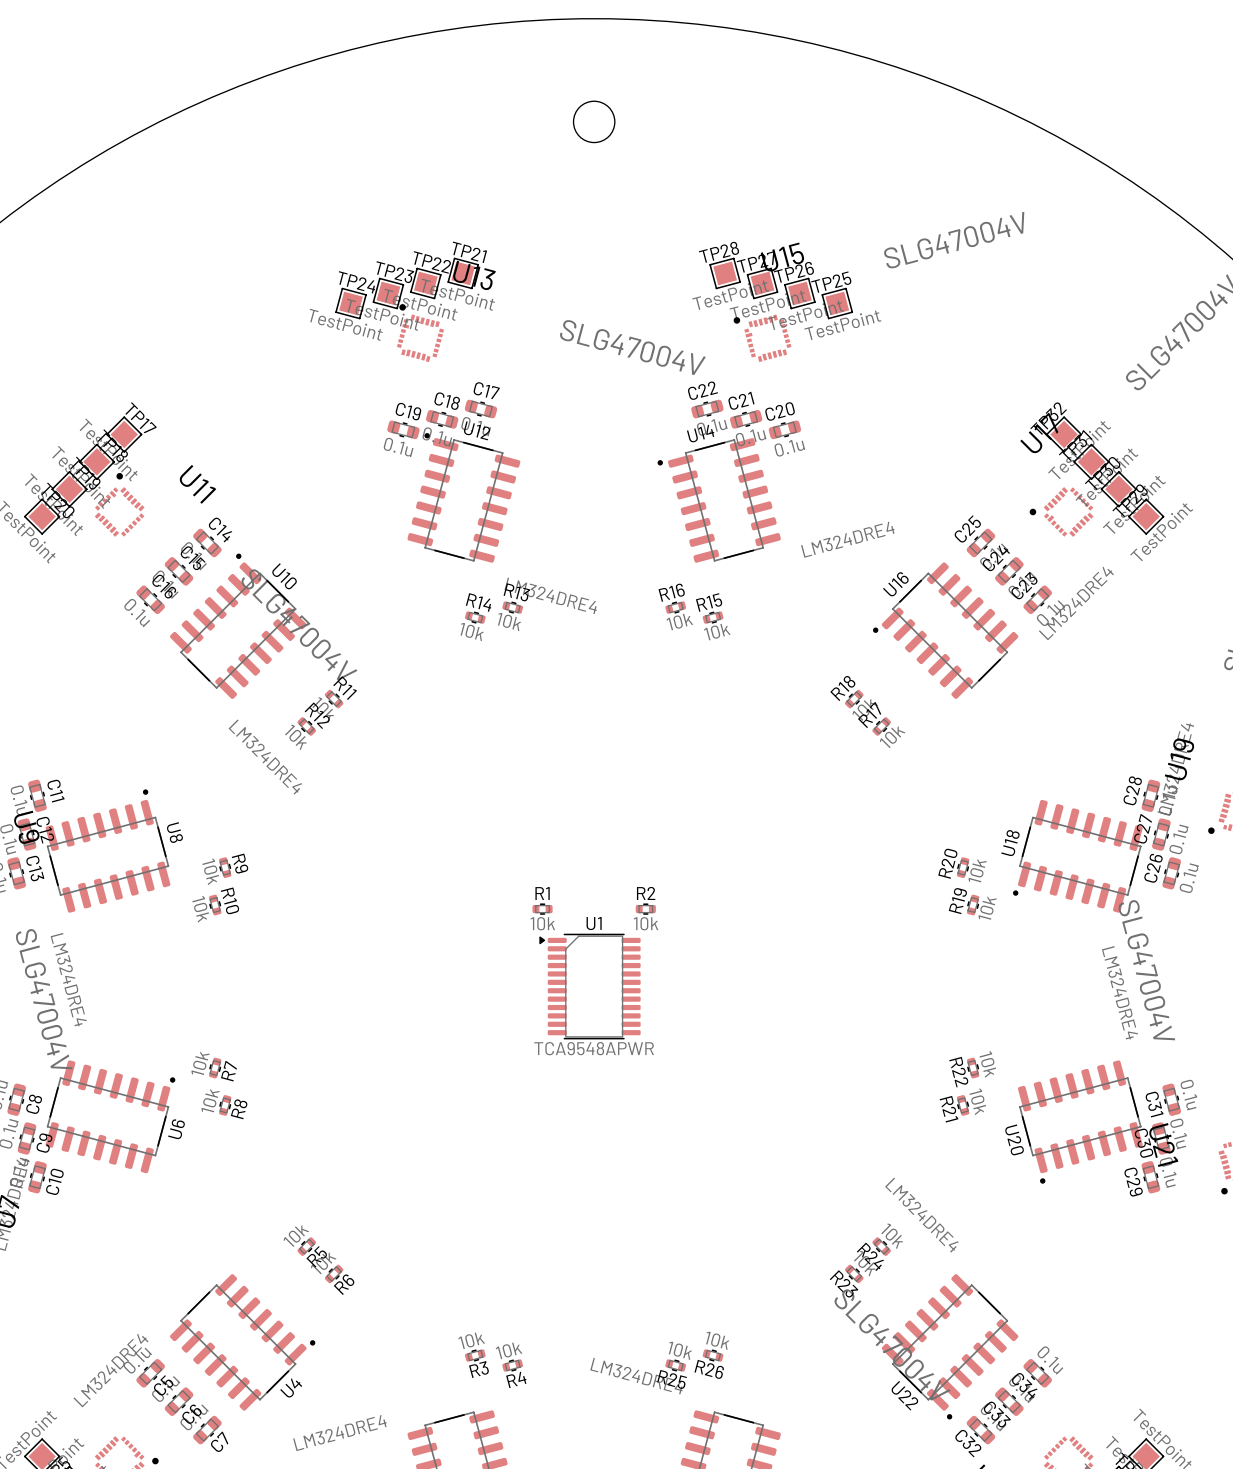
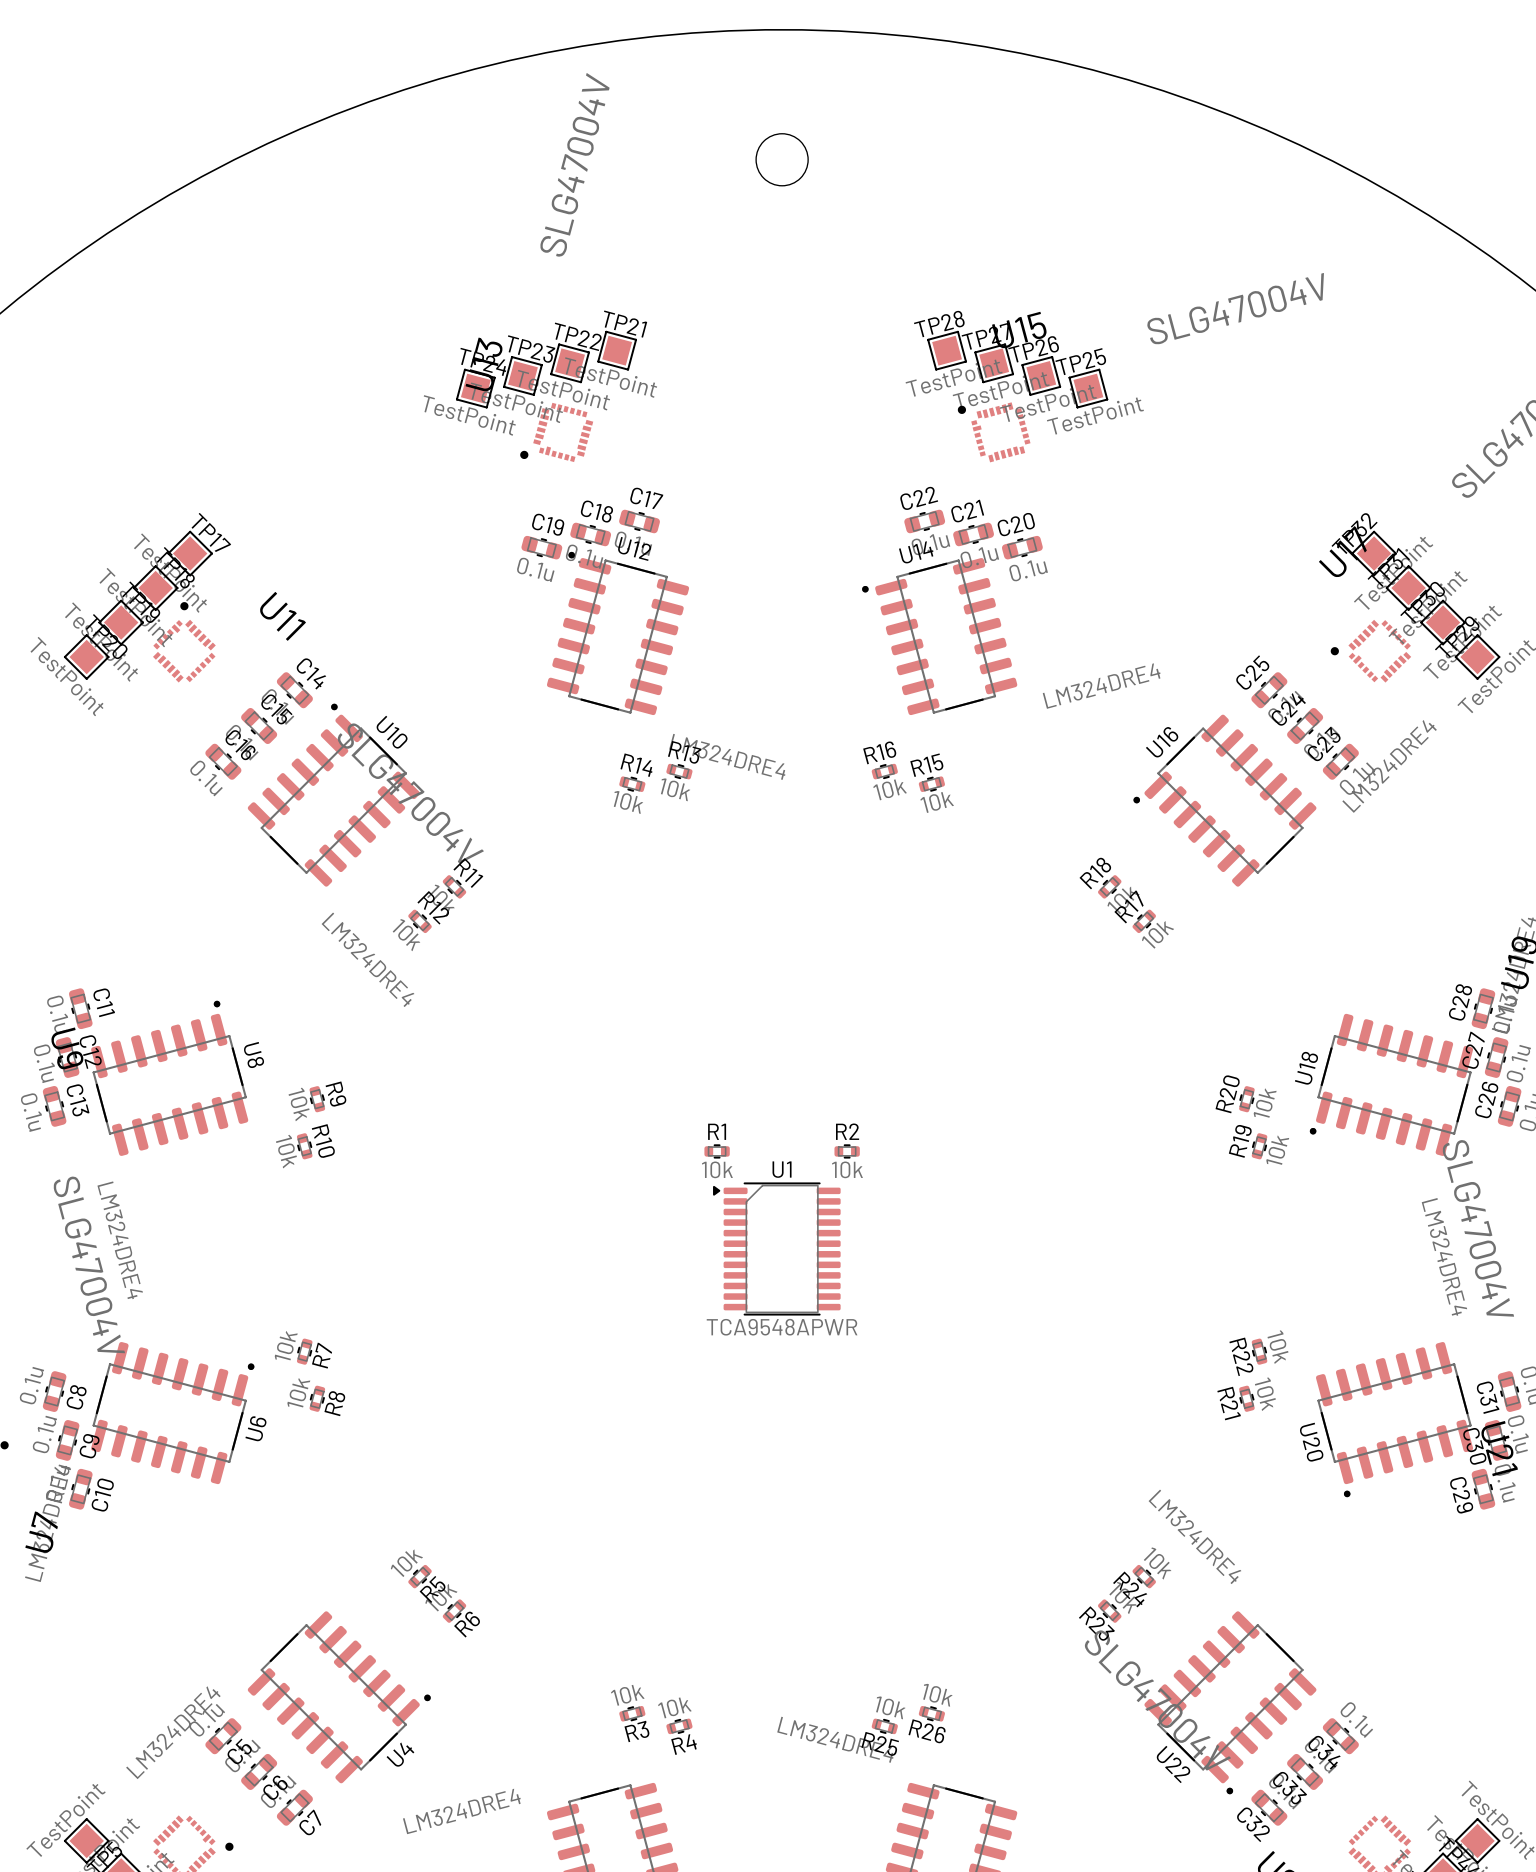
U13 rotation: 0° (420, 333) -> 90° counterclockwise (556, 432)

